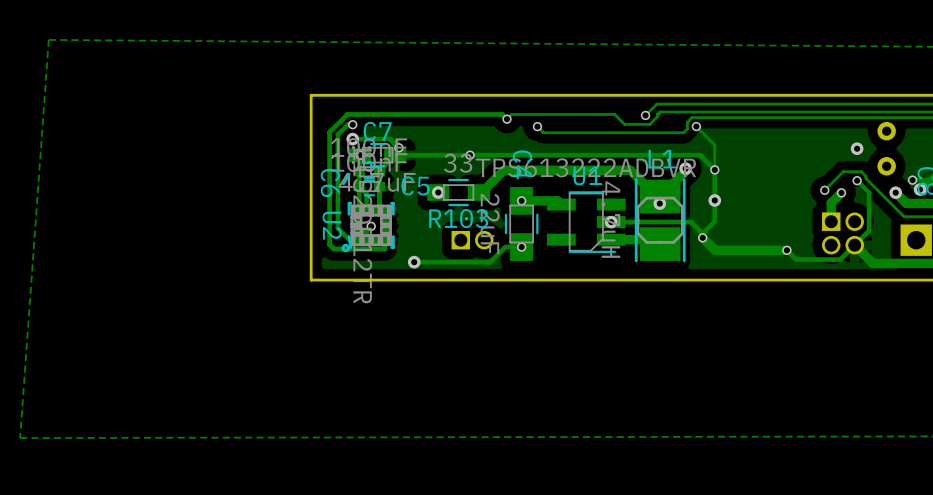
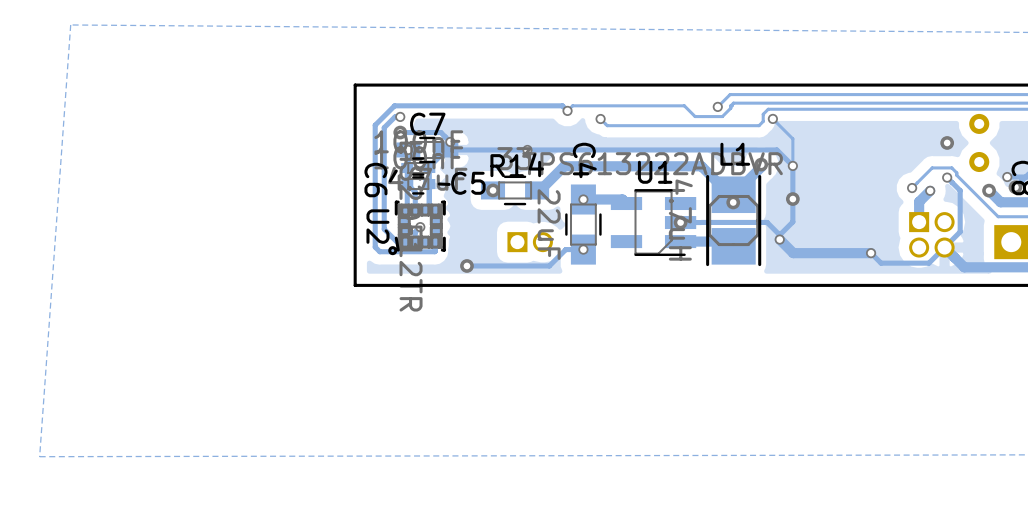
line: none -> (439, 184) (449, 184)
R103 name: R103 (458, 218) -> R14 (517, 165)

